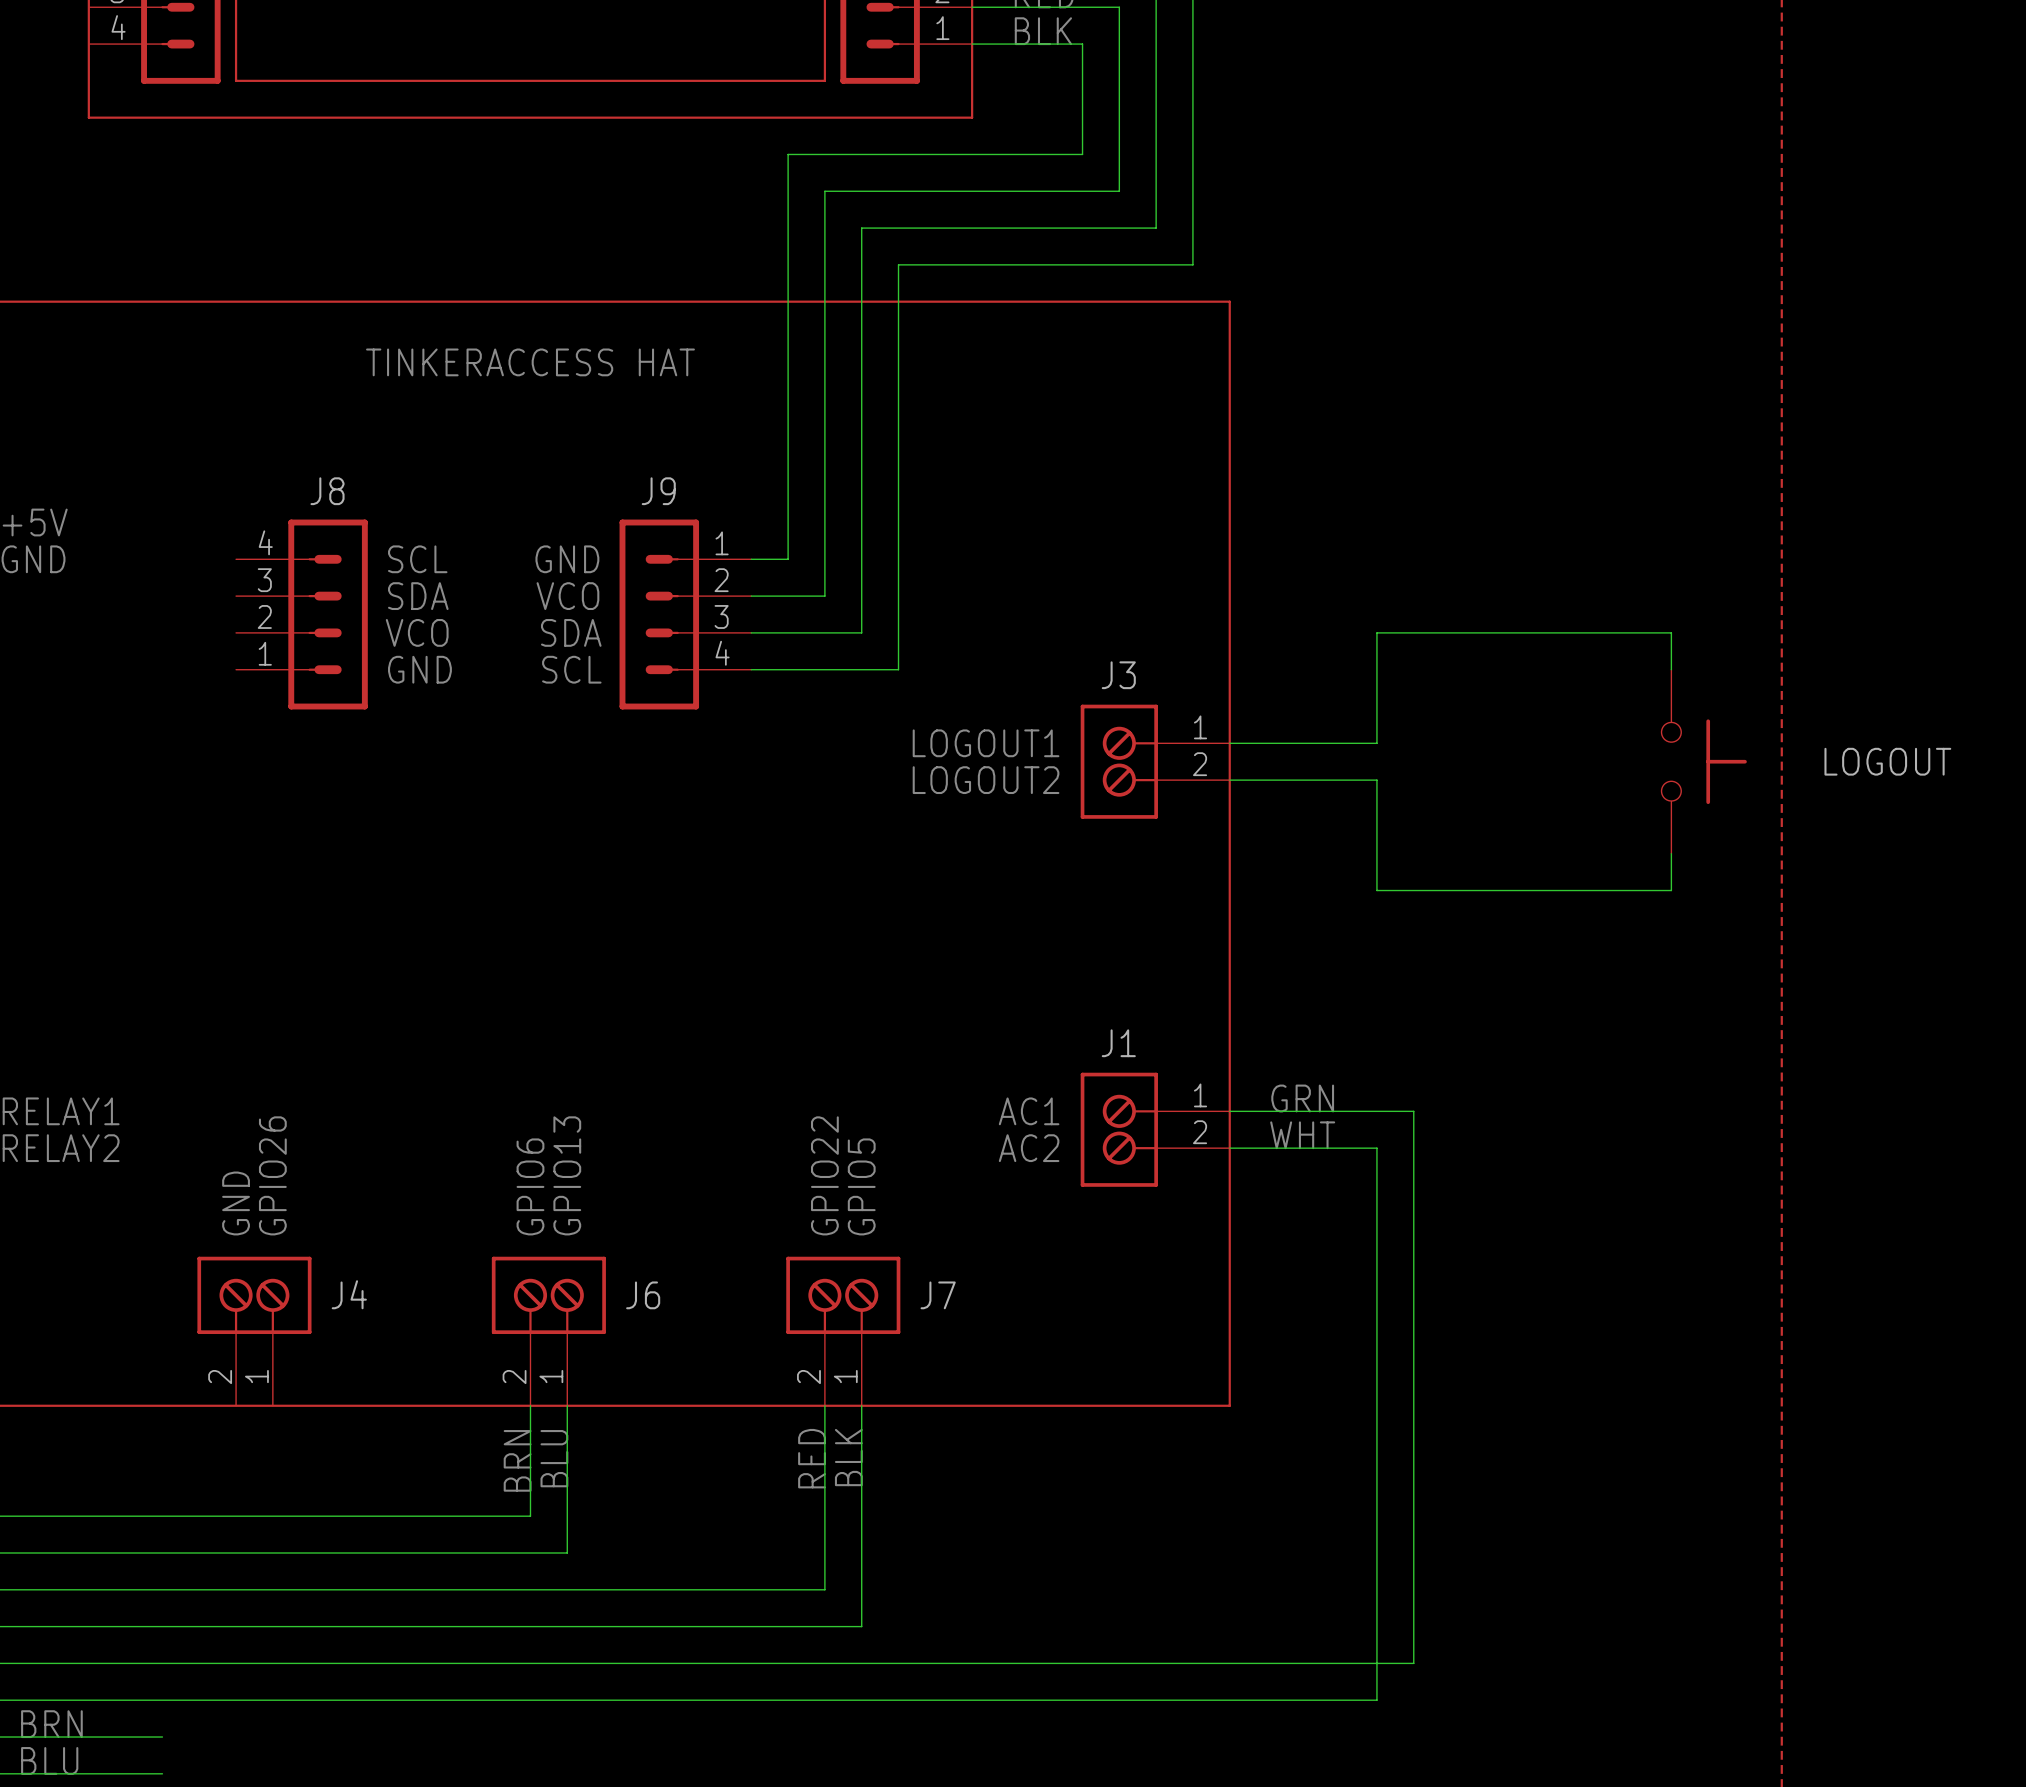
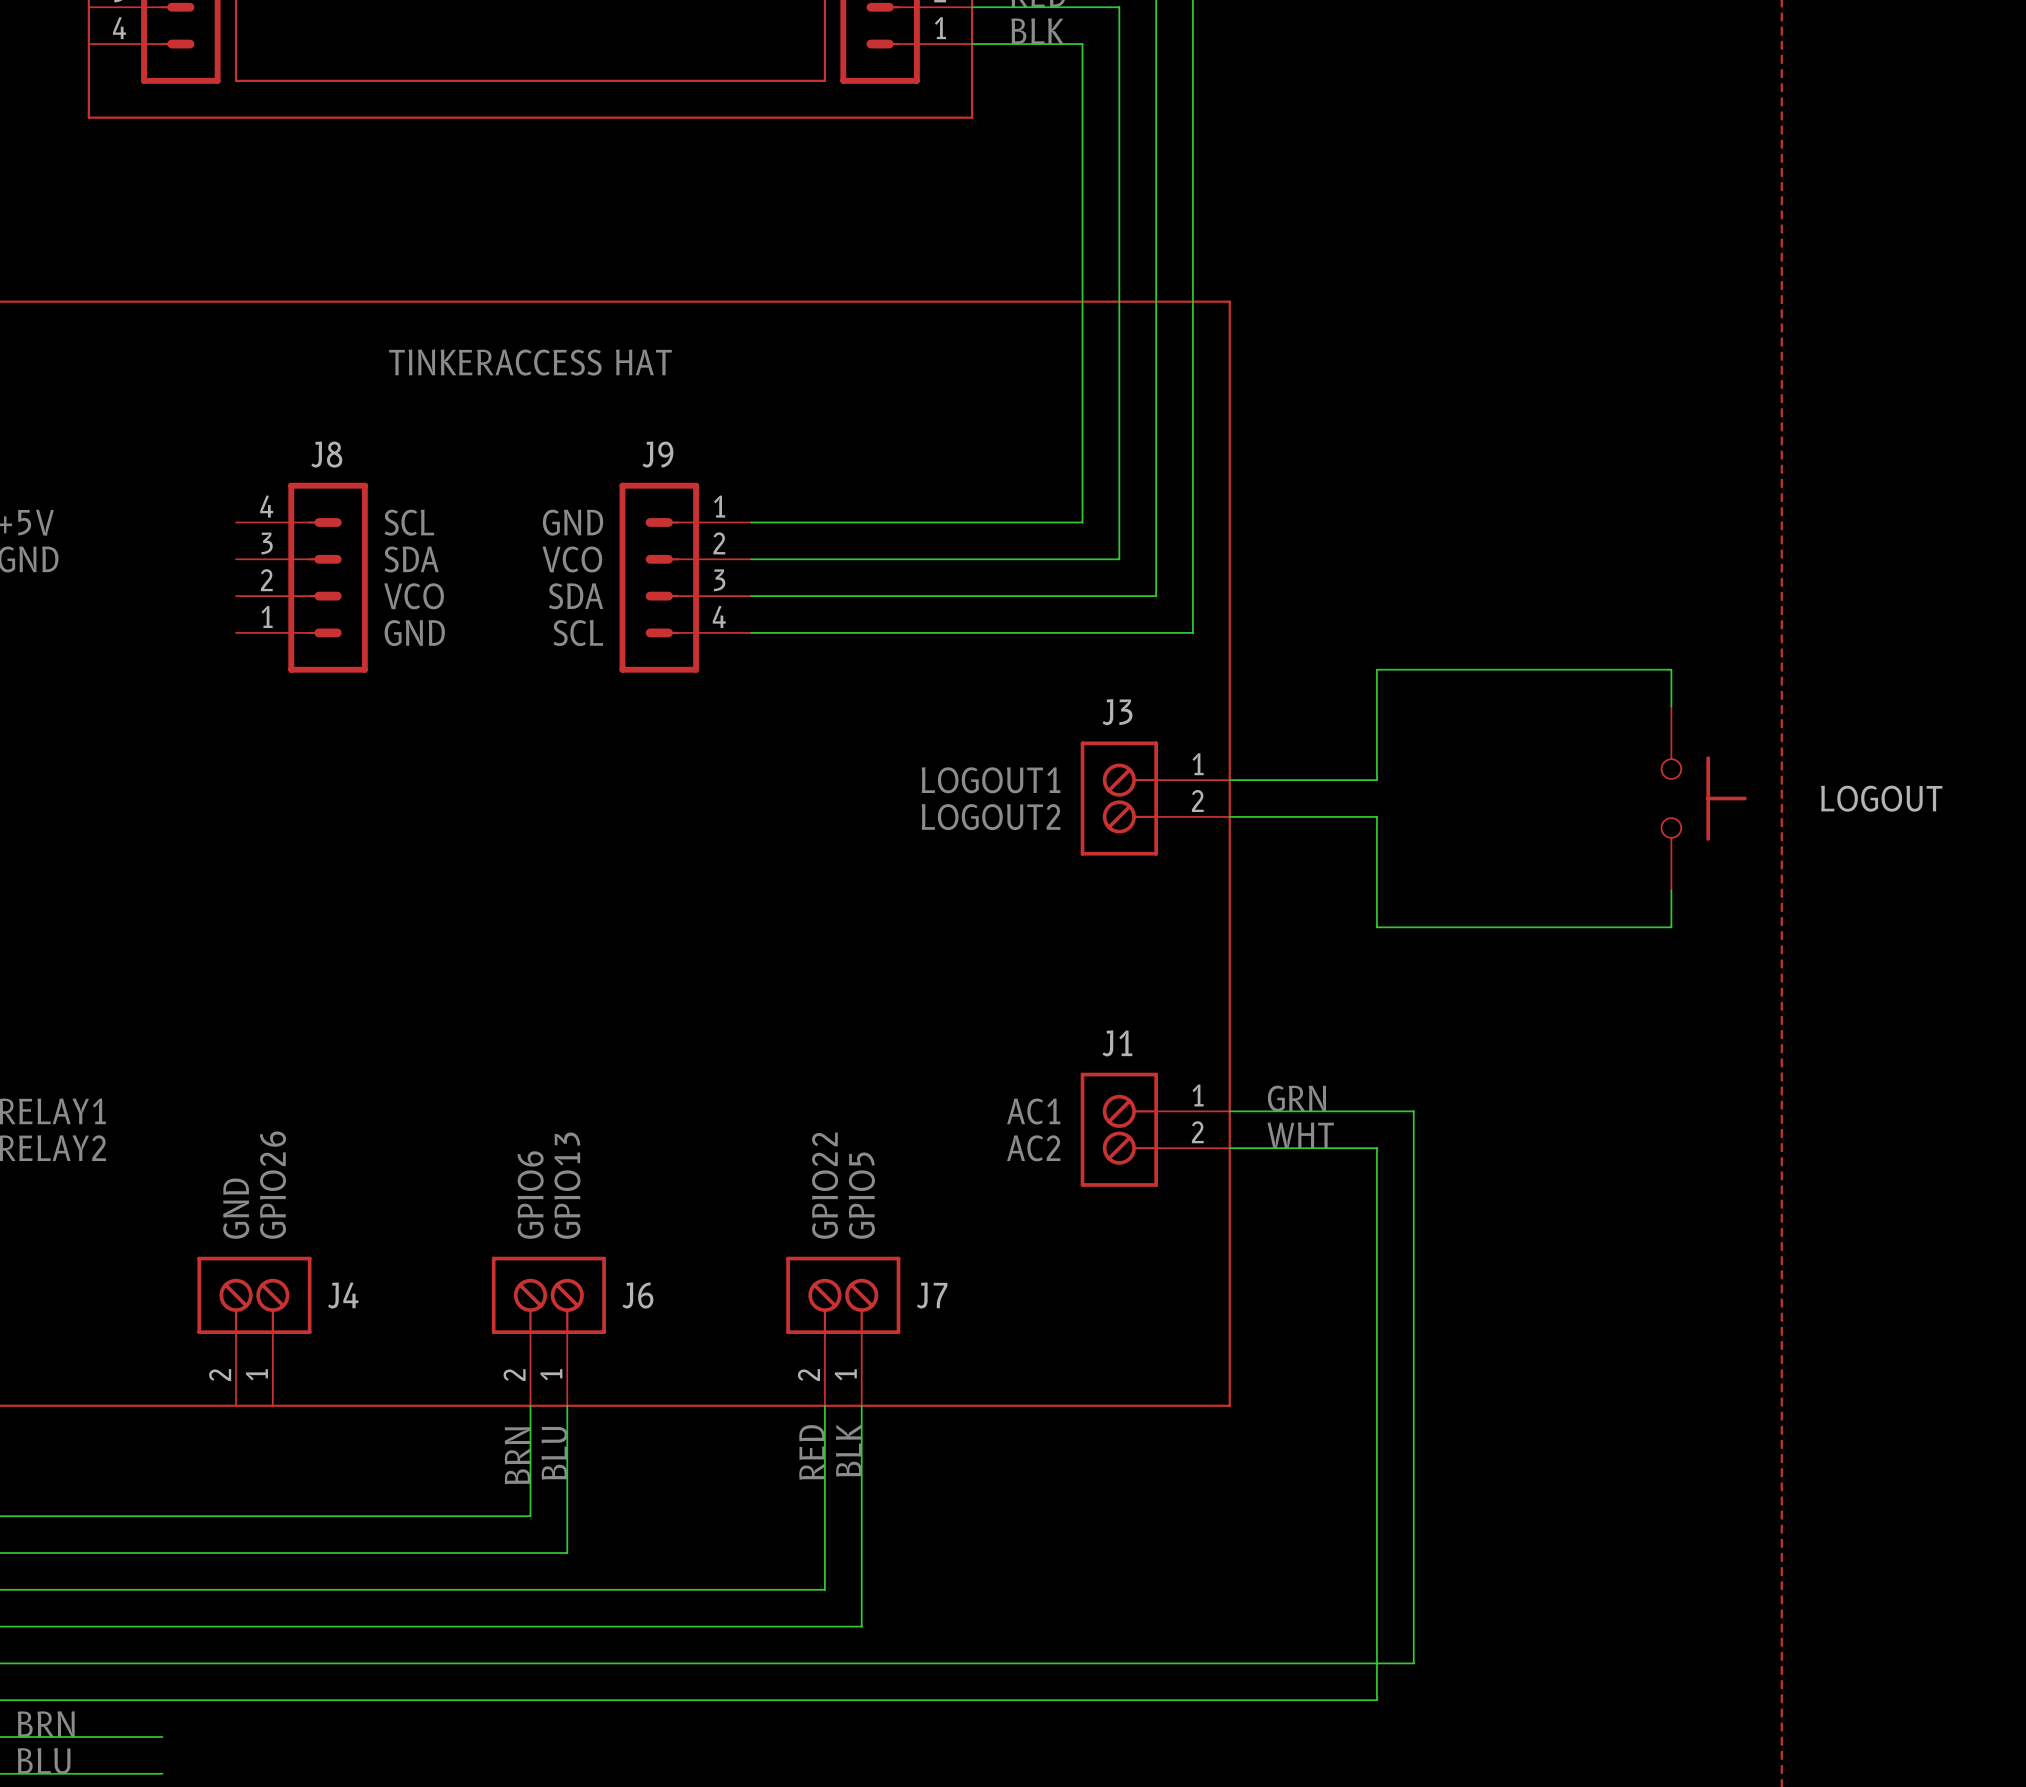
wire: (1082, 154) (788, 154) (788, 559) -> (1082, 154) (1082, 522) (751, 522)
wire: (1119, 191) (824, 191) (824, 596) -> (1119, 191) (1119, 559) (788, 559)
wire: (1156, 228) (861, 228) (861, 632) -> (1192, 264) (1192, 632) (861, 632)
wire: none -> (1156, 228) (1156, 596) (824, 596)
wire: (1192, 264) (898, 264) (898, 669) (751, 669) -> none
text: SCL (417, 559) -> SDA (411, 559)
text: GND (567, 559) -> VCO (572, 559)
text: SDA (418, 596) -> VCO (414, 596)
text: VCO (567, 596) -> SDA (575, 596)
J8 position: (301, 614) -> (301, 577)
J9 position: (685, 614) -> (685, 577)
text: VCO (417, 632) -> GND (414, 633)
text: SDA (571, 632) -> SCL (578, 633)
text position: GND (419, 669) -> GND (573, 522)
text position: SCL (571, 669) -> SCL (409, 522)
wire: (1376, 669) (1376, 632) (1671, 632) (1671, 669) -> (1376, 669) (1671, 669) (1671, 706)
text: LOGOUT1 (986, 743) -> none
wire: (1229, 743) (1376, 743) -> (1229, 816) (1376, 816)
J3 position: (1155, 761) -> (1155, 798)
part position: (1704, 761) -> (1704, 798)
text: LOGOUT2 (986, 780) -> LOGOUT1 (990, 780)
wire: (1376, 780) (1376, 816) -> (1376, 780) (1376, 743)
text: none -> LOGOUT2 (991, 817)
wire: (1671, 853) (1671, 890) (1376, 890) -> (1671, 890) (1671, 927) (1376, 927) (1376, 890)

